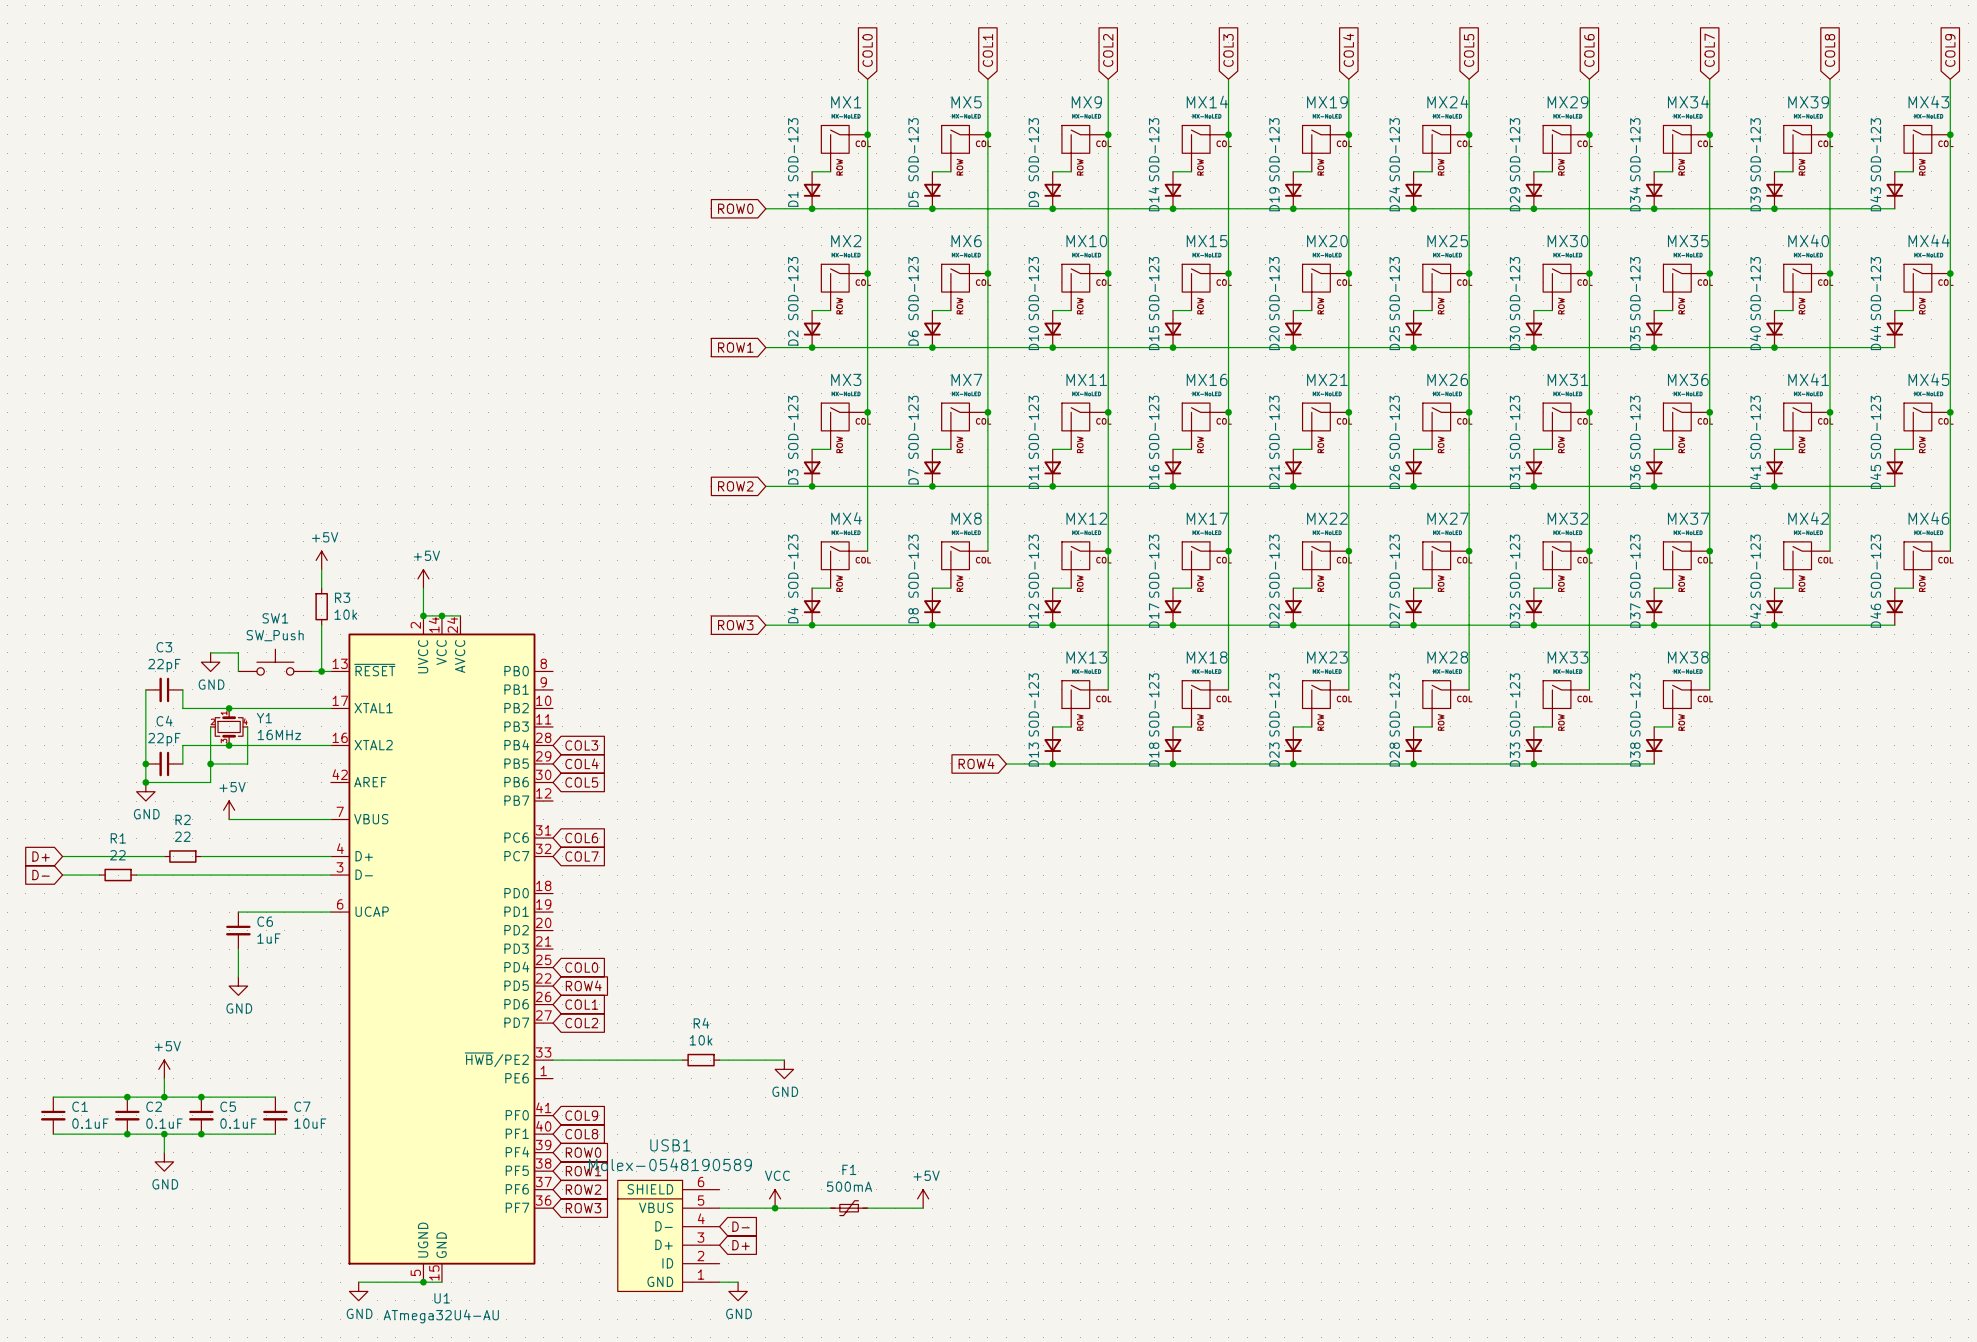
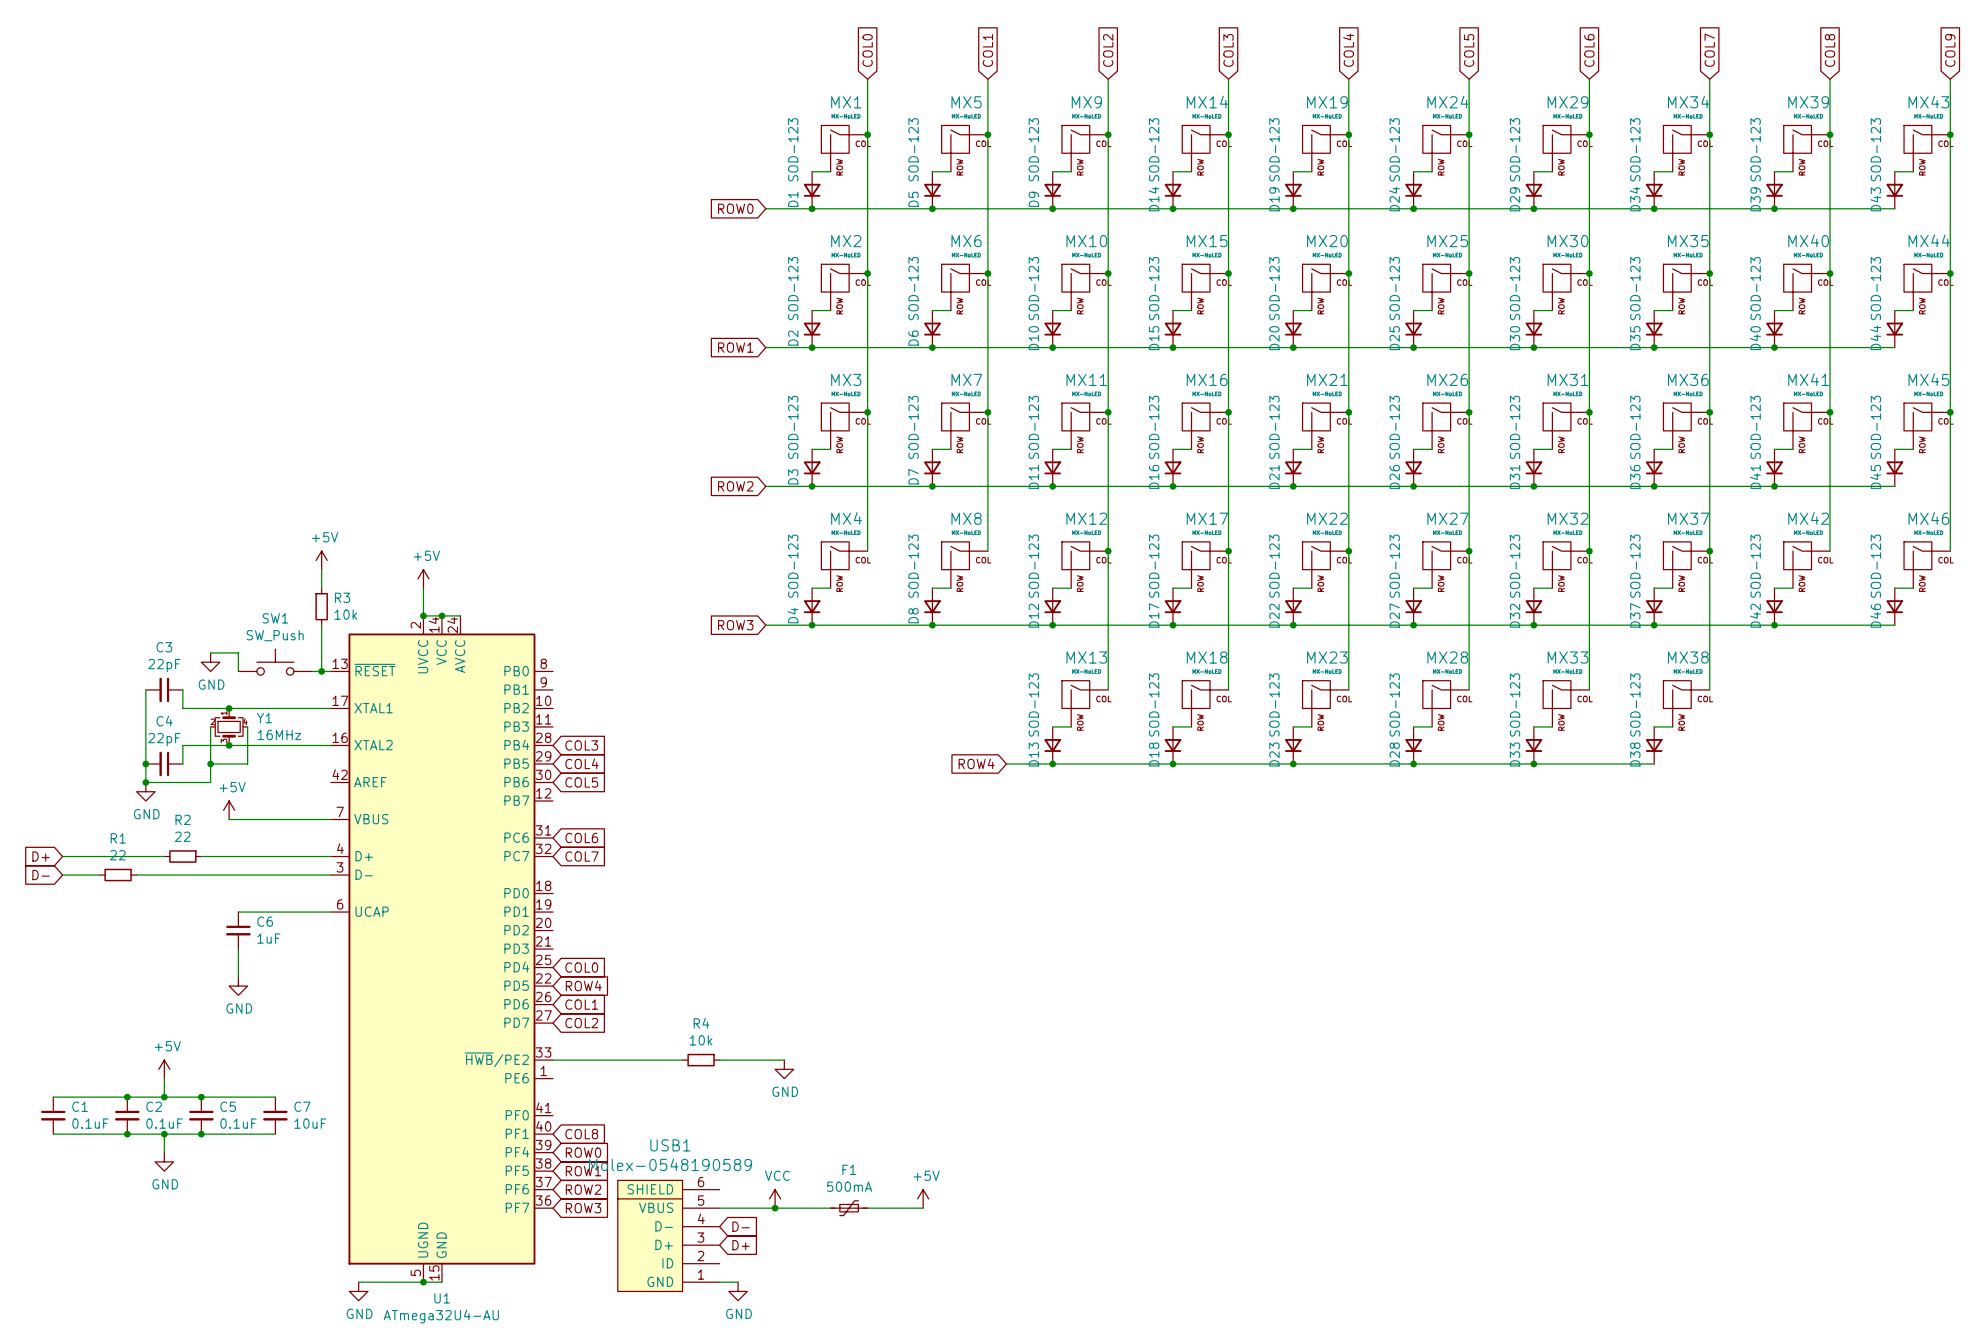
global label: COL9 (581, 1115) -> none

